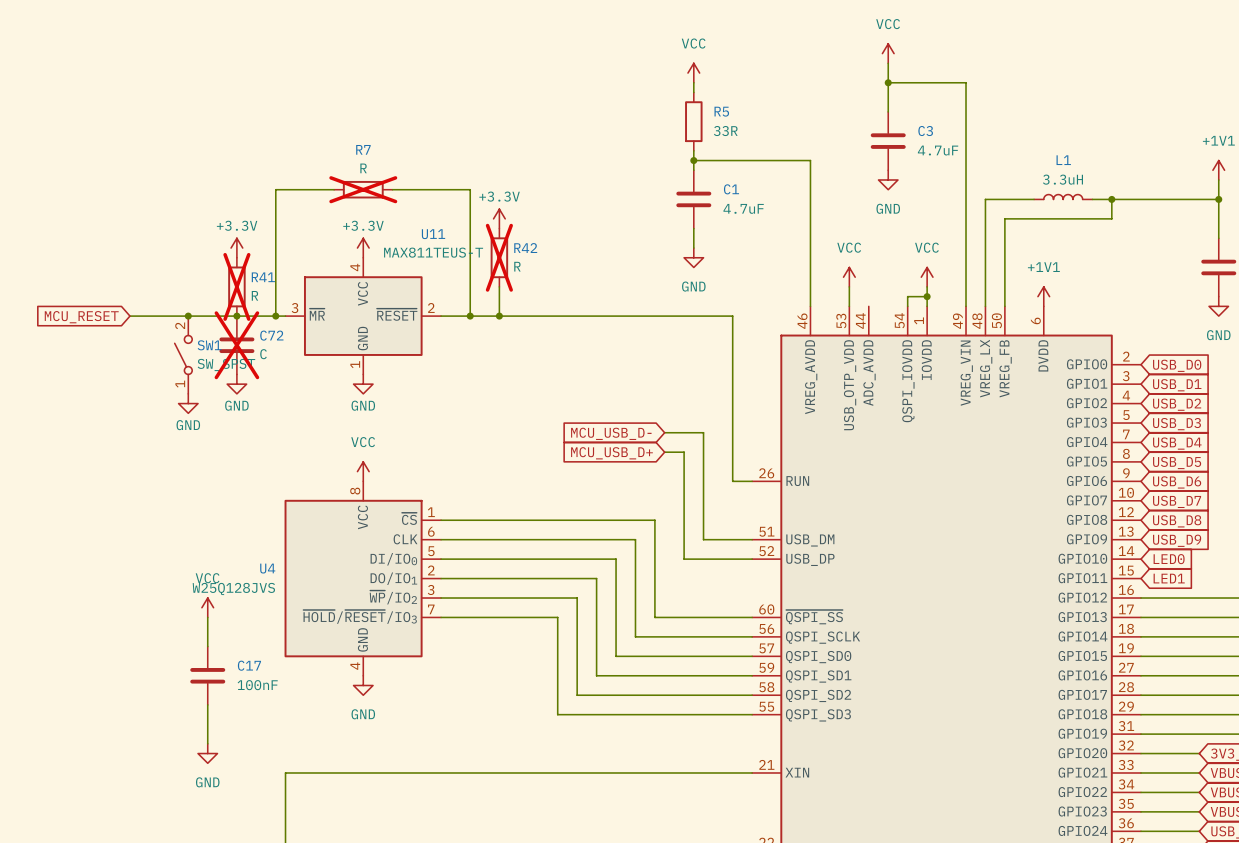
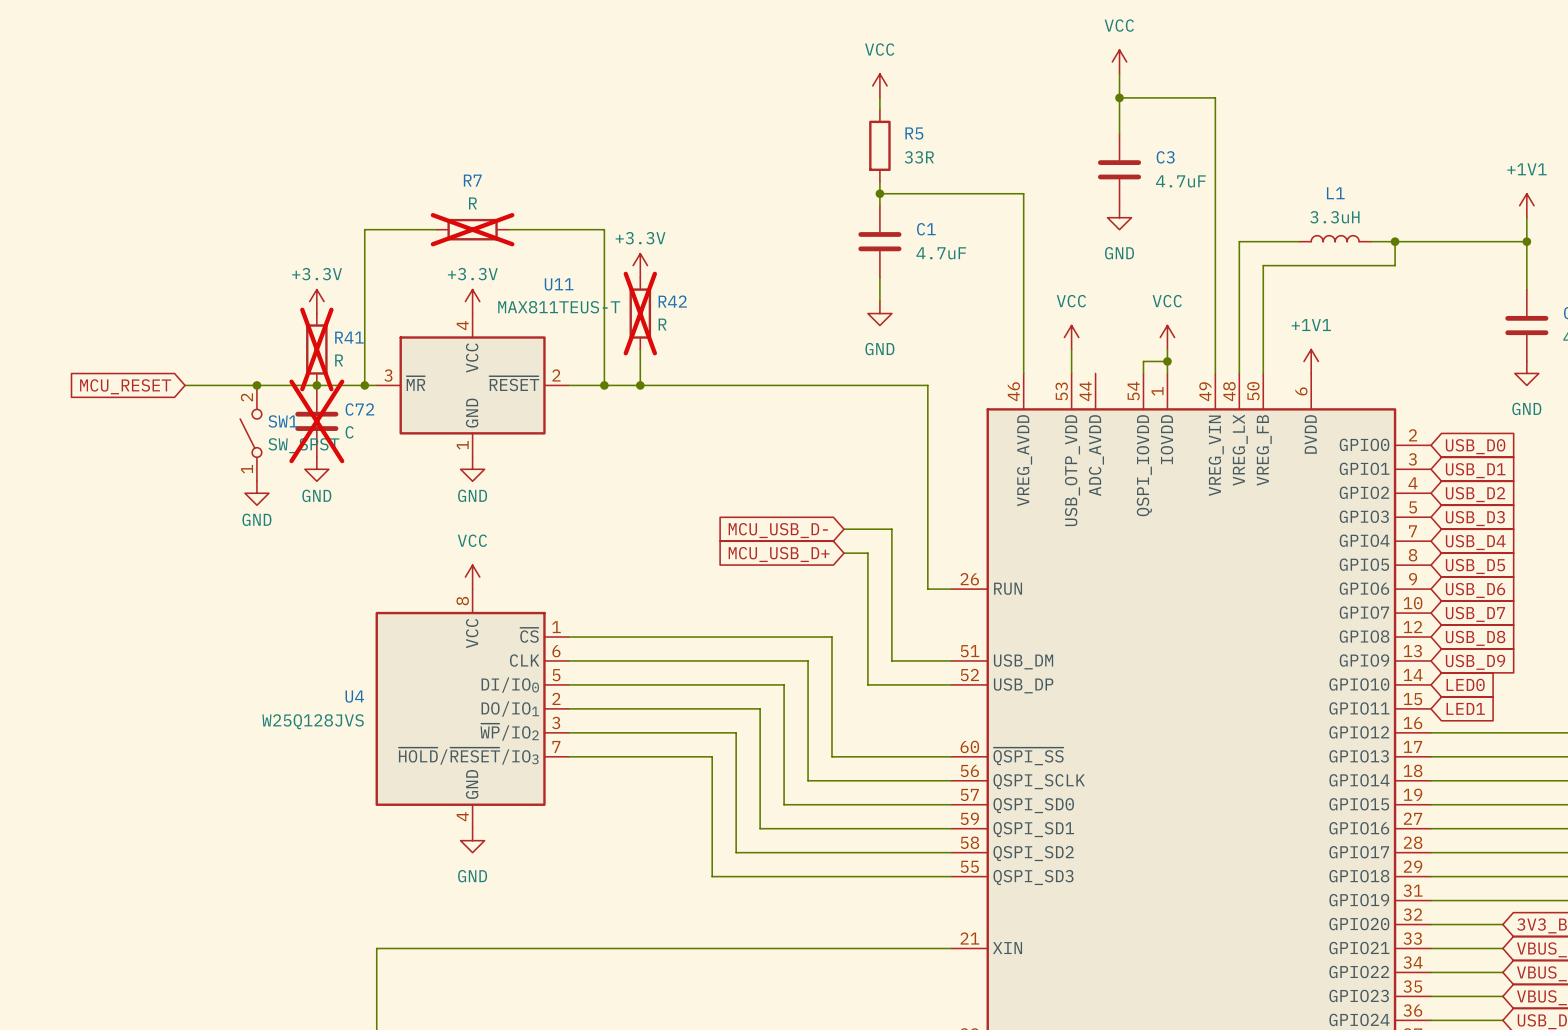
power symbol: VCC (207, 607) -> none
wire: (207, 617) (207, 646) -> none
C17: 100nF (207, 675) -> none
wire: (207, 704) (207, 743) -> none
power symbol: GND (207, 753) -> none

